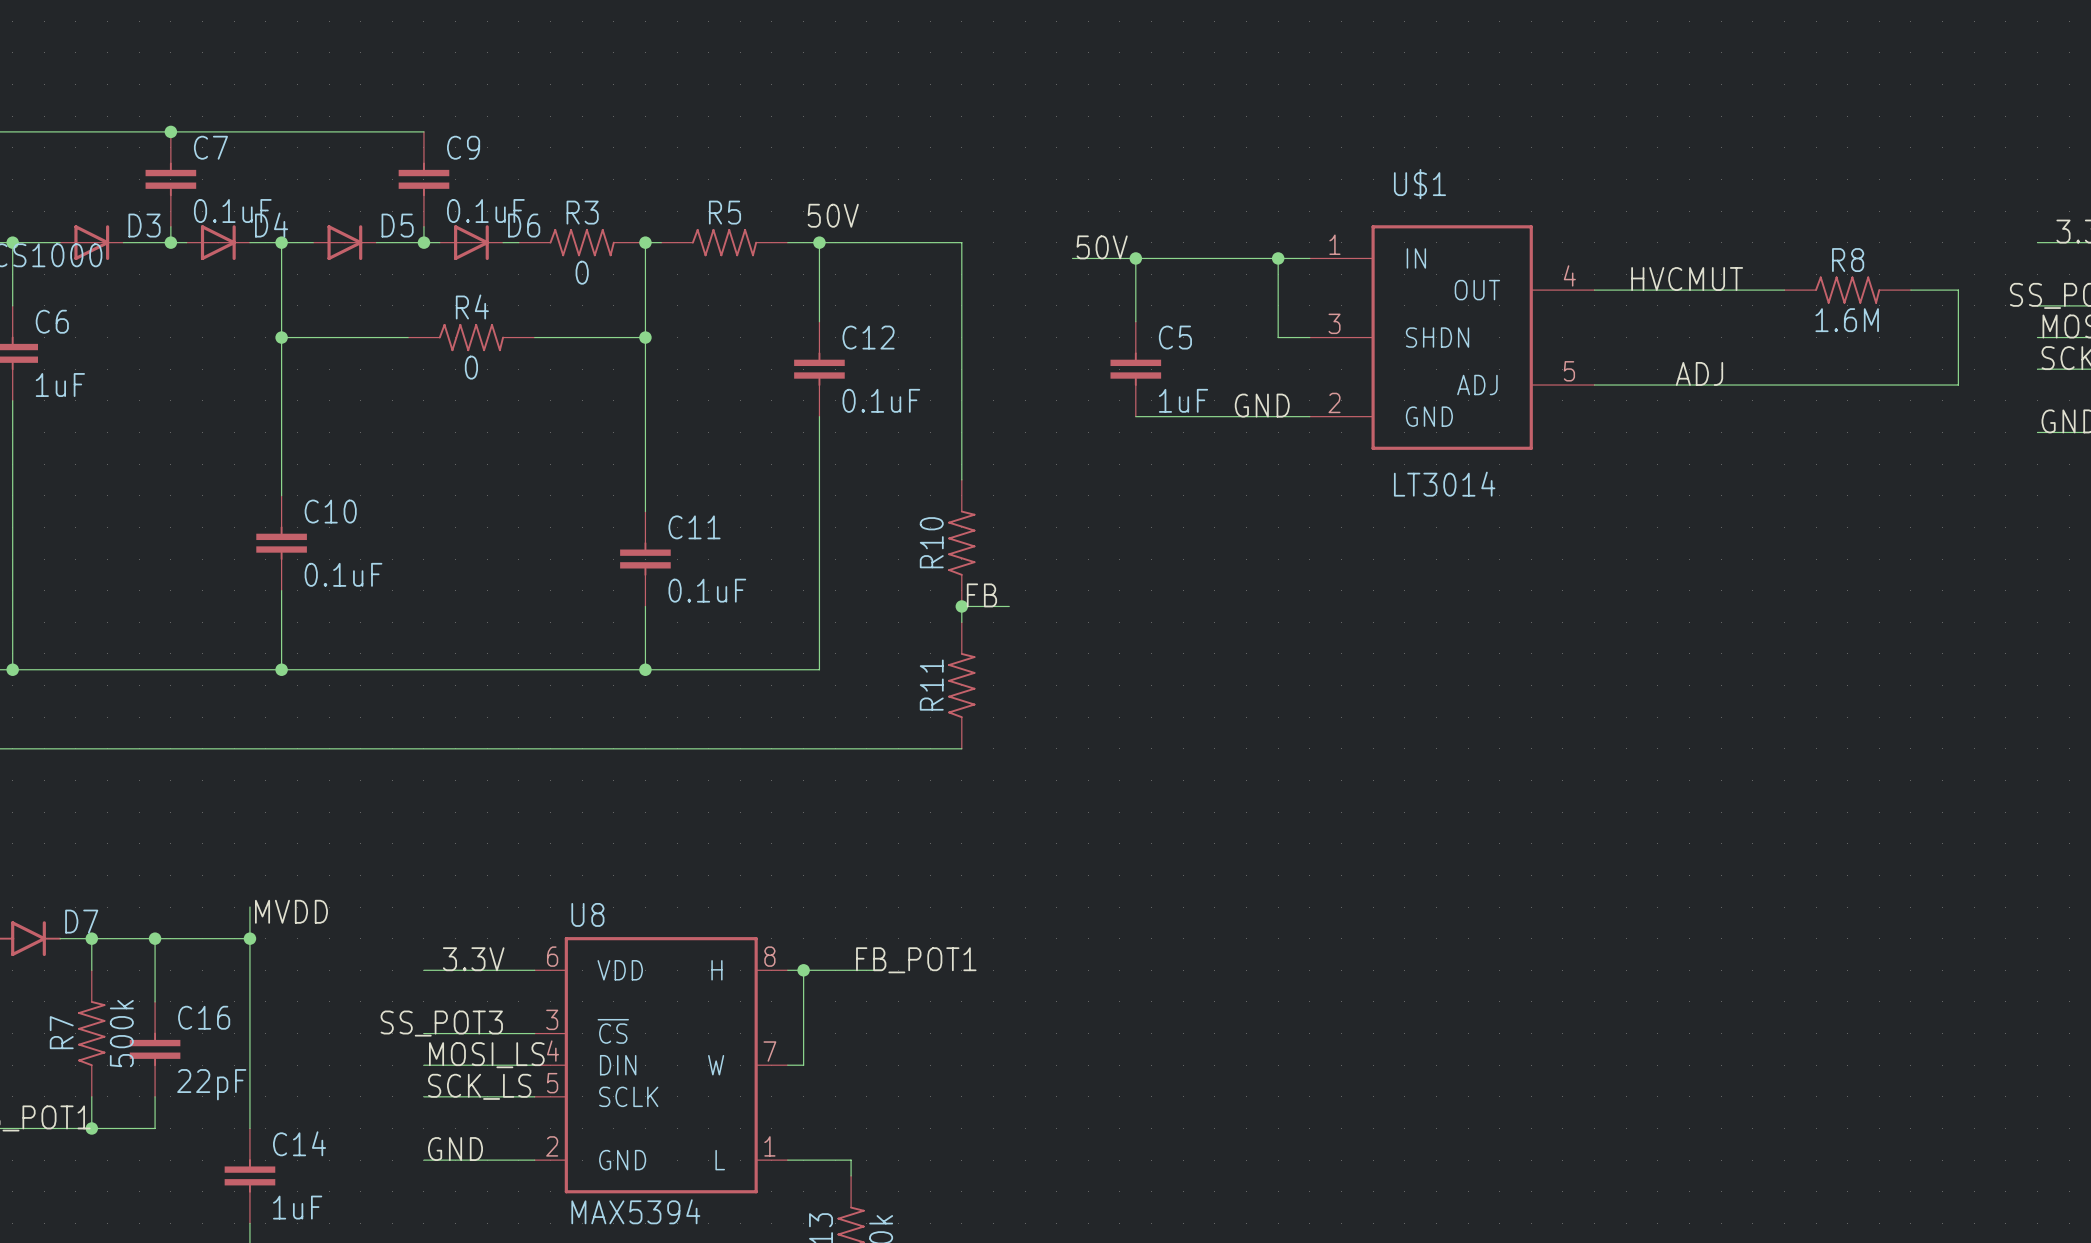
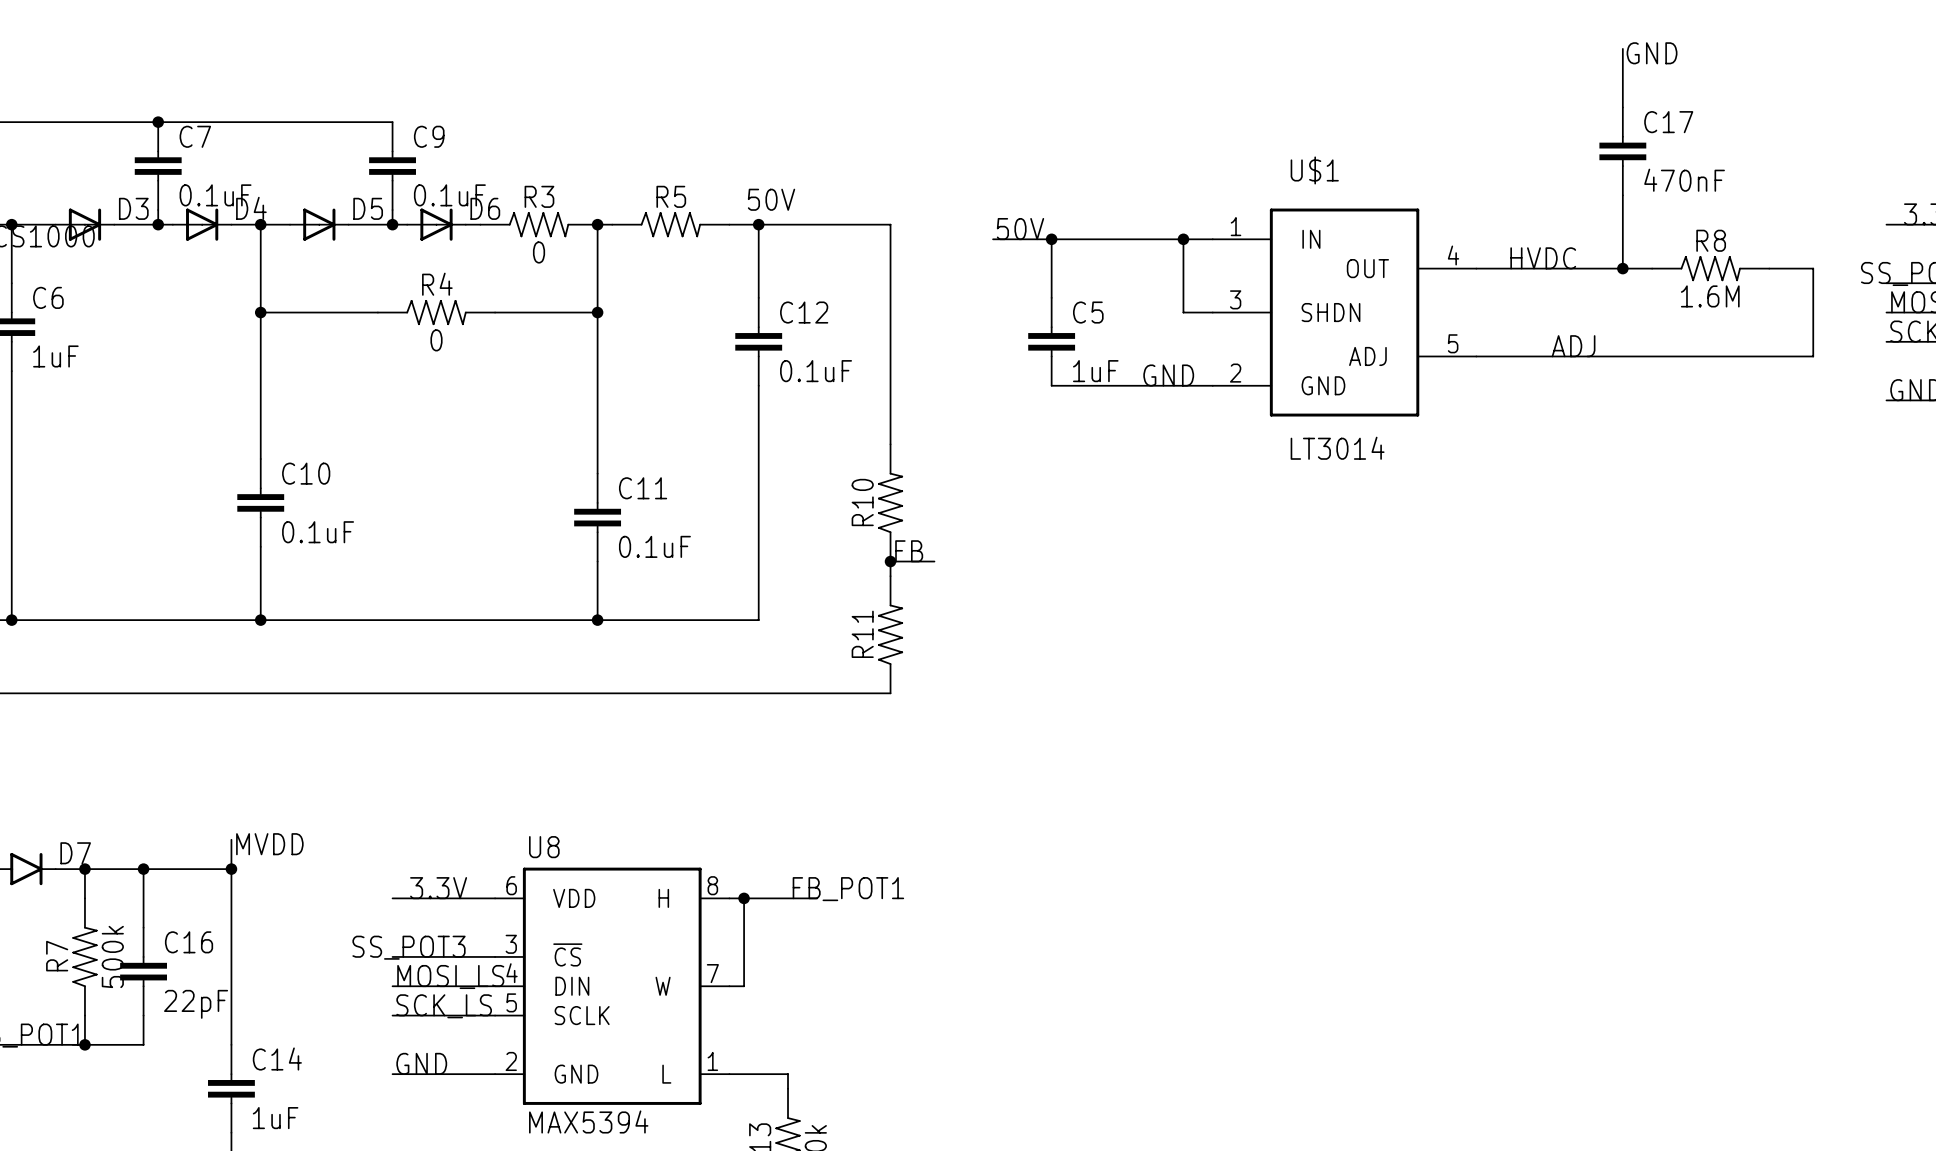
wire: none -> (1622, 48) (1622, 107)
label: none -> GND (1652, 53)
C17: none -> 470nF (1622, 151)
wire: none -> (1622, 195) (1622, 268)
label: HVCMUT (1687, 279) -> HVDC (1543, 258)
junction: none -> (1622, 268)

